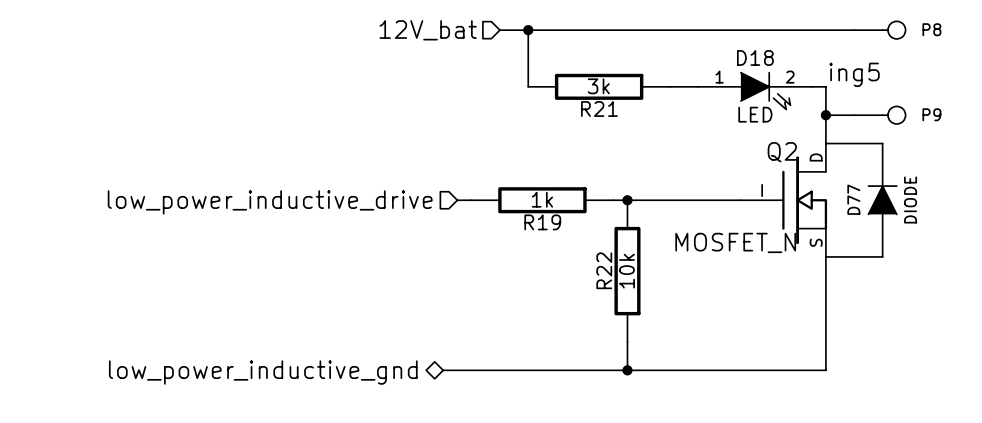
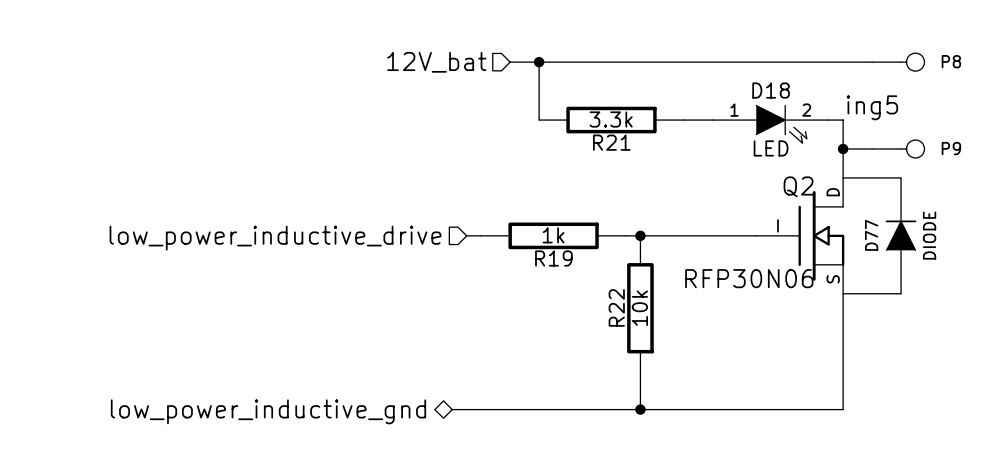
R21 value: 3k (598, 86) -> 3.3k (611, 119)
Q2 value: MOSFET_N (735, 242) -> RFP30N06 (749, 278)

